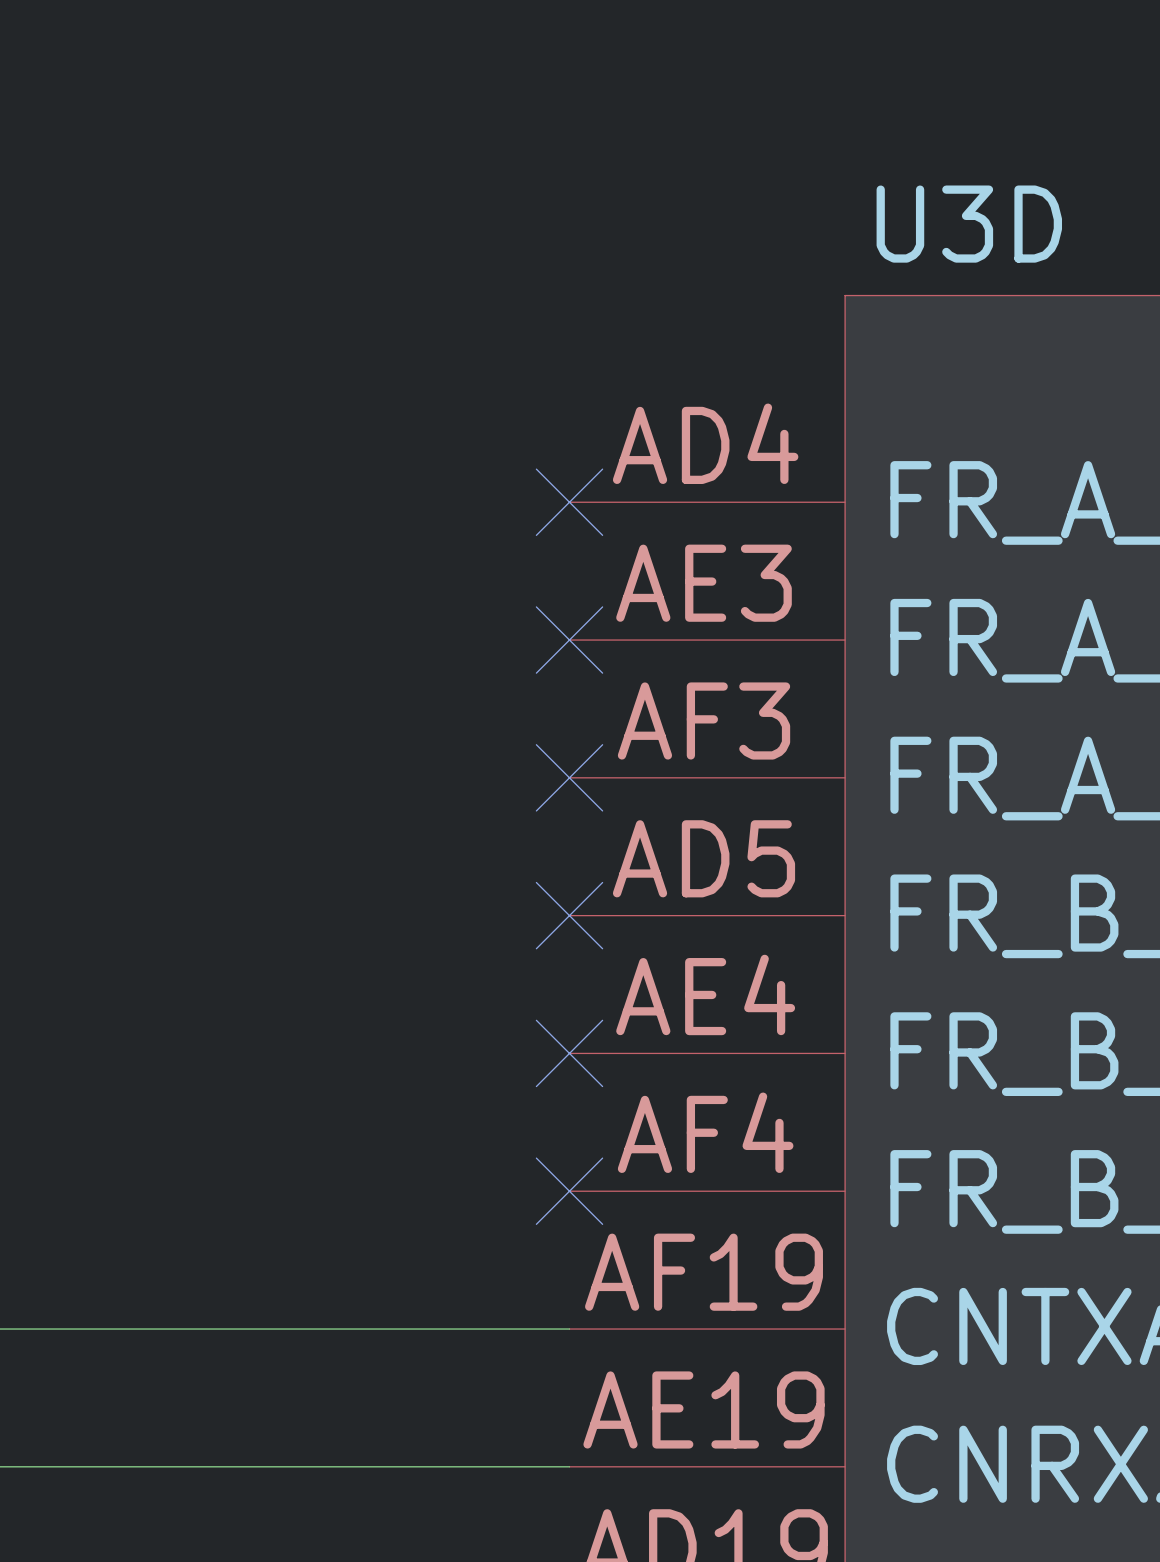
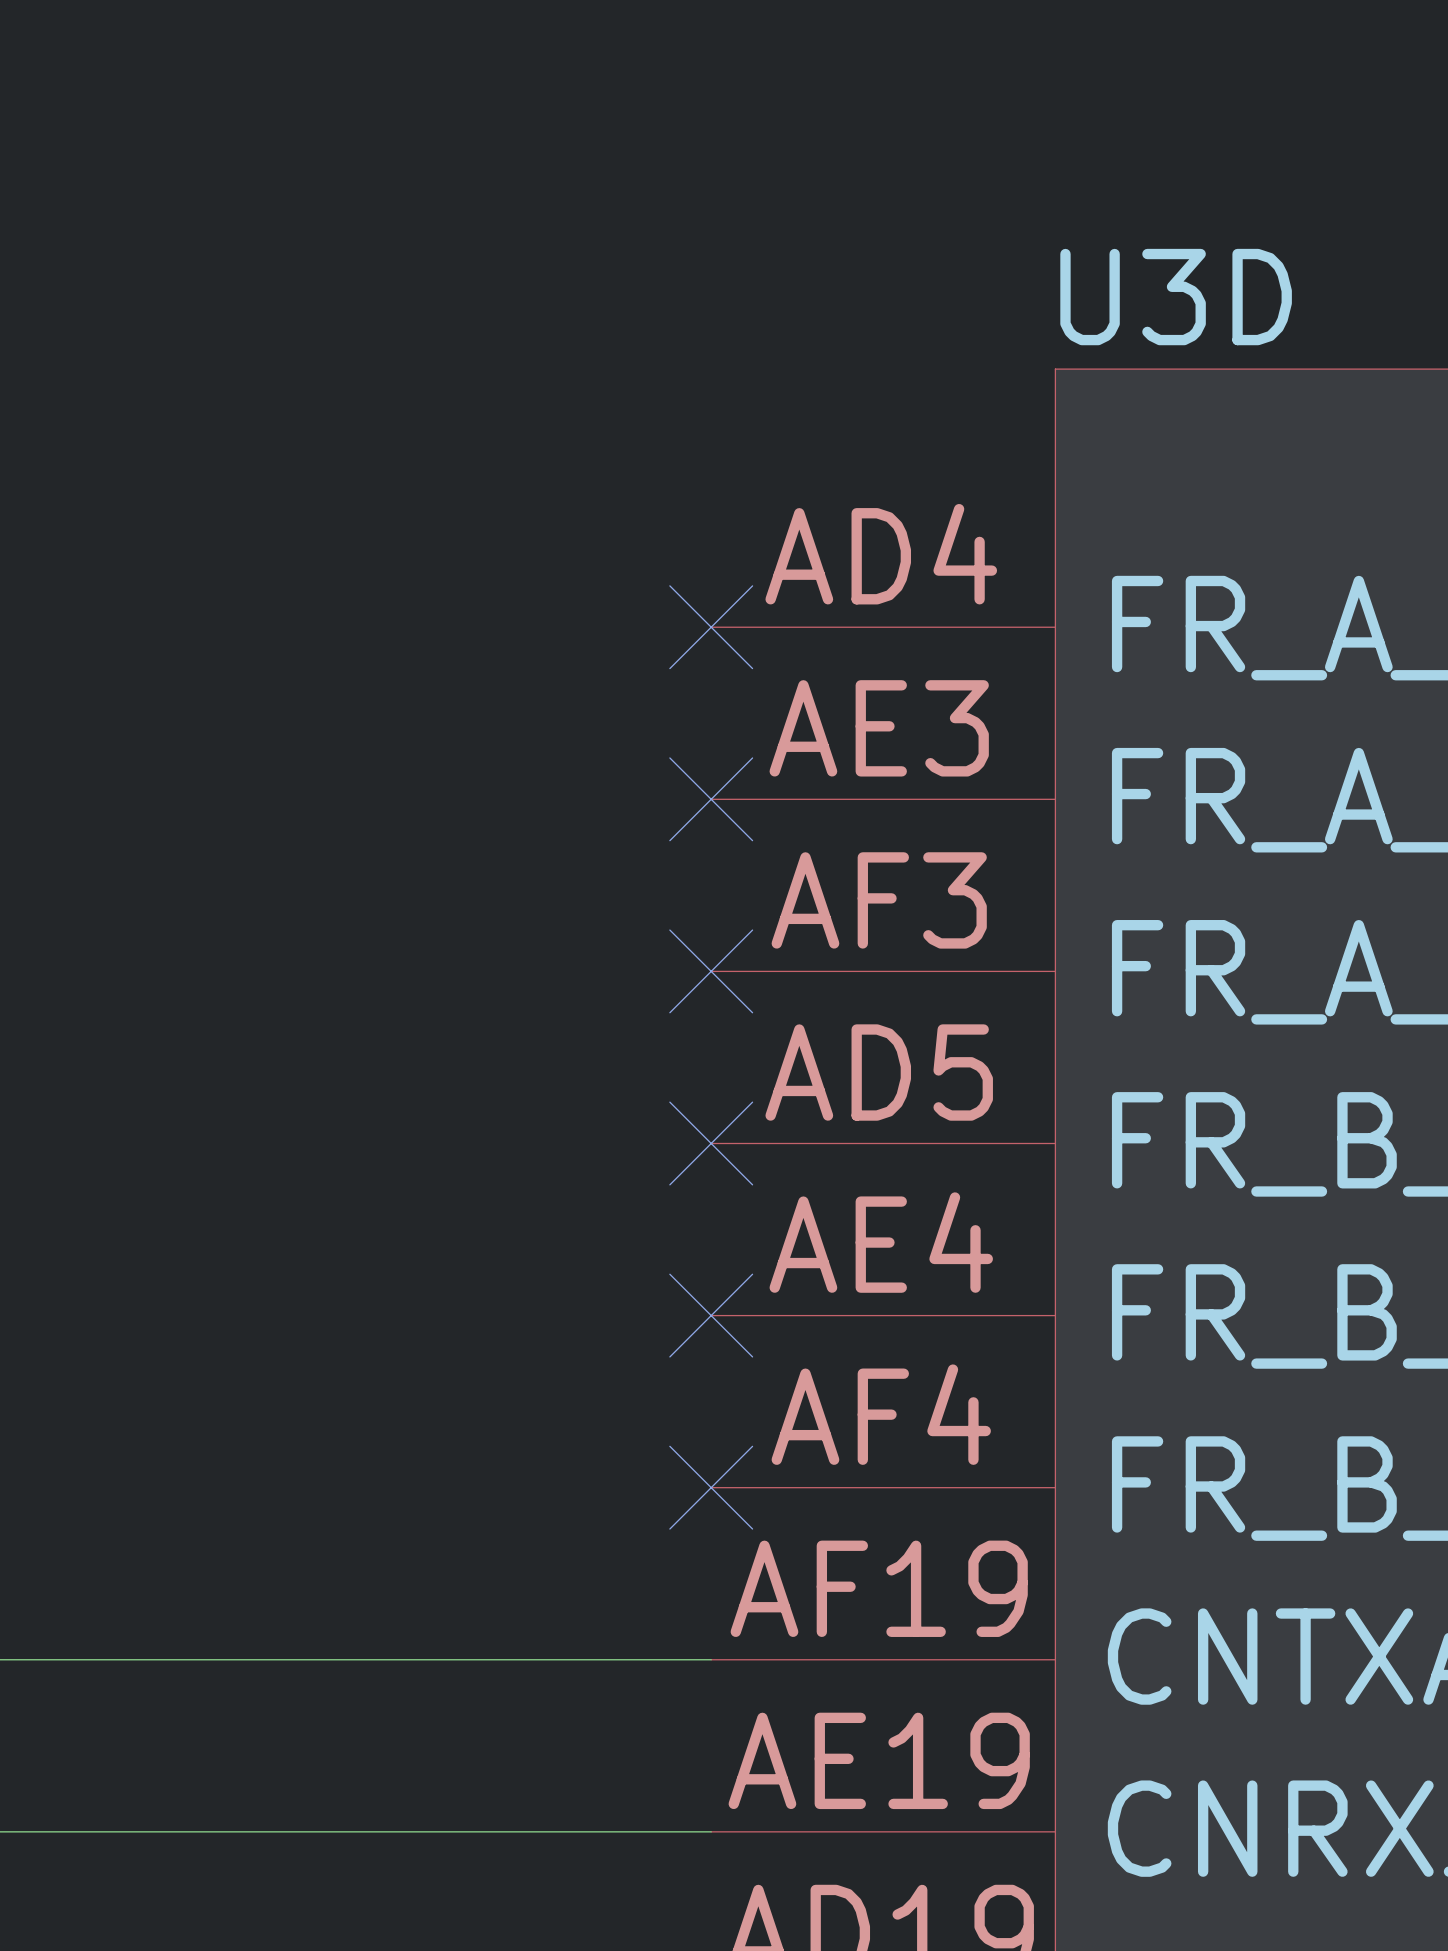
U3D name position: U3D (969, 224) -> U3D (1176, 297)

